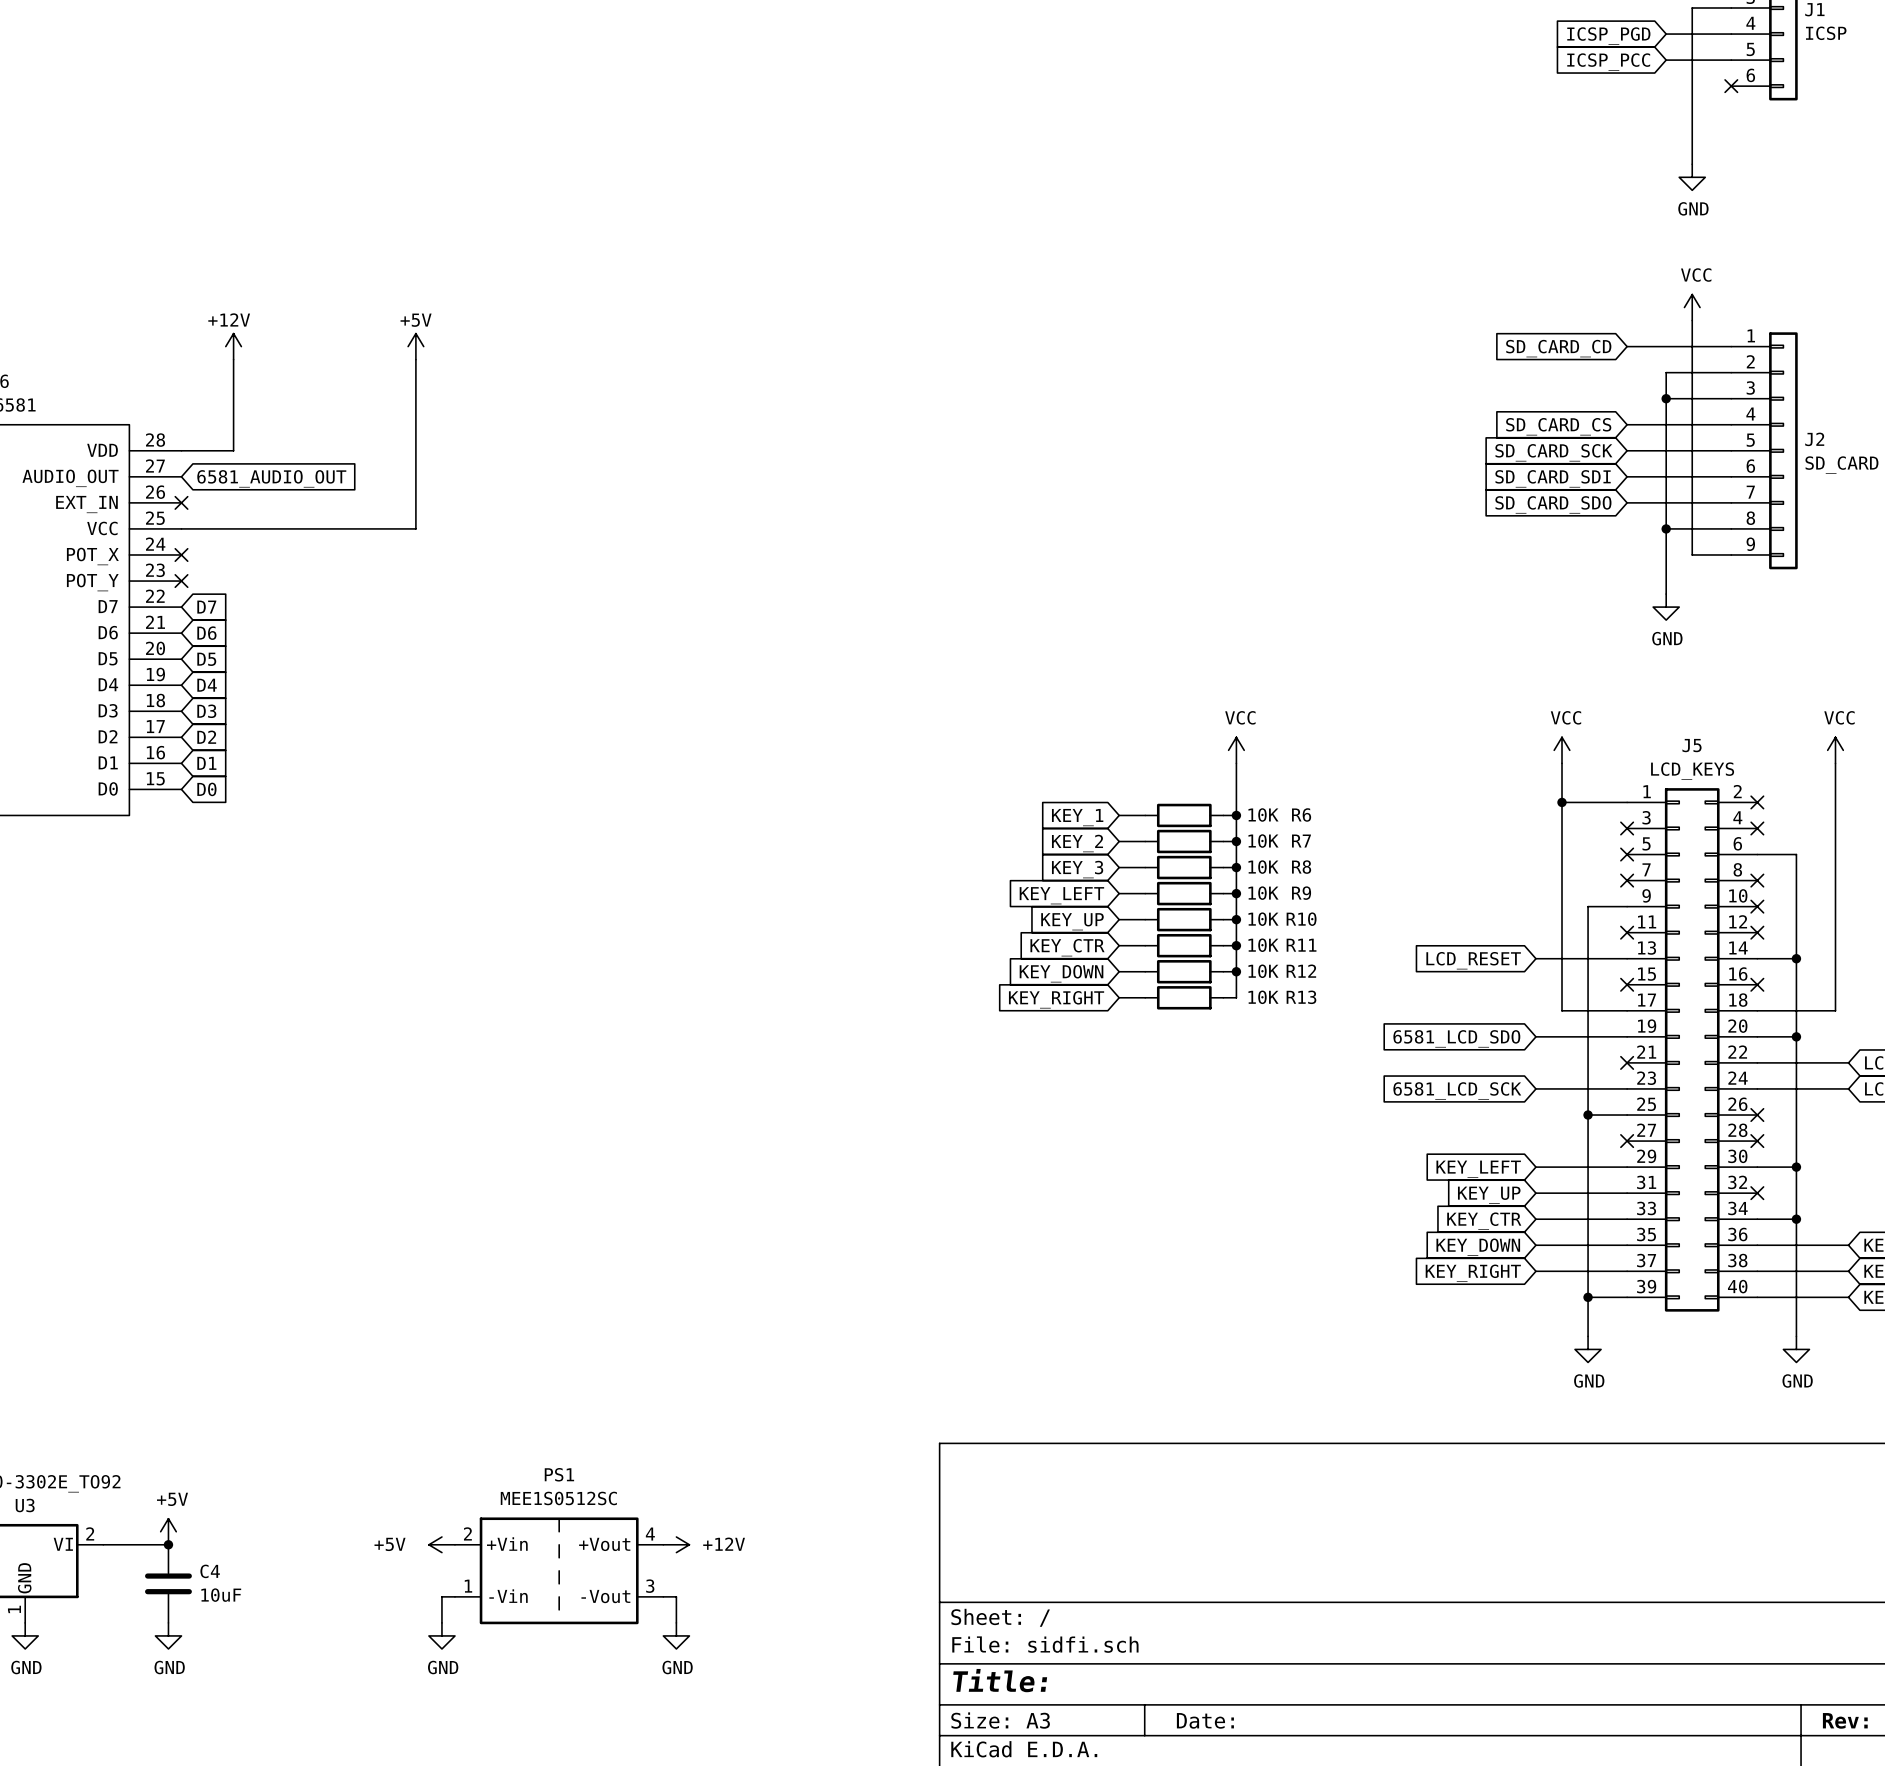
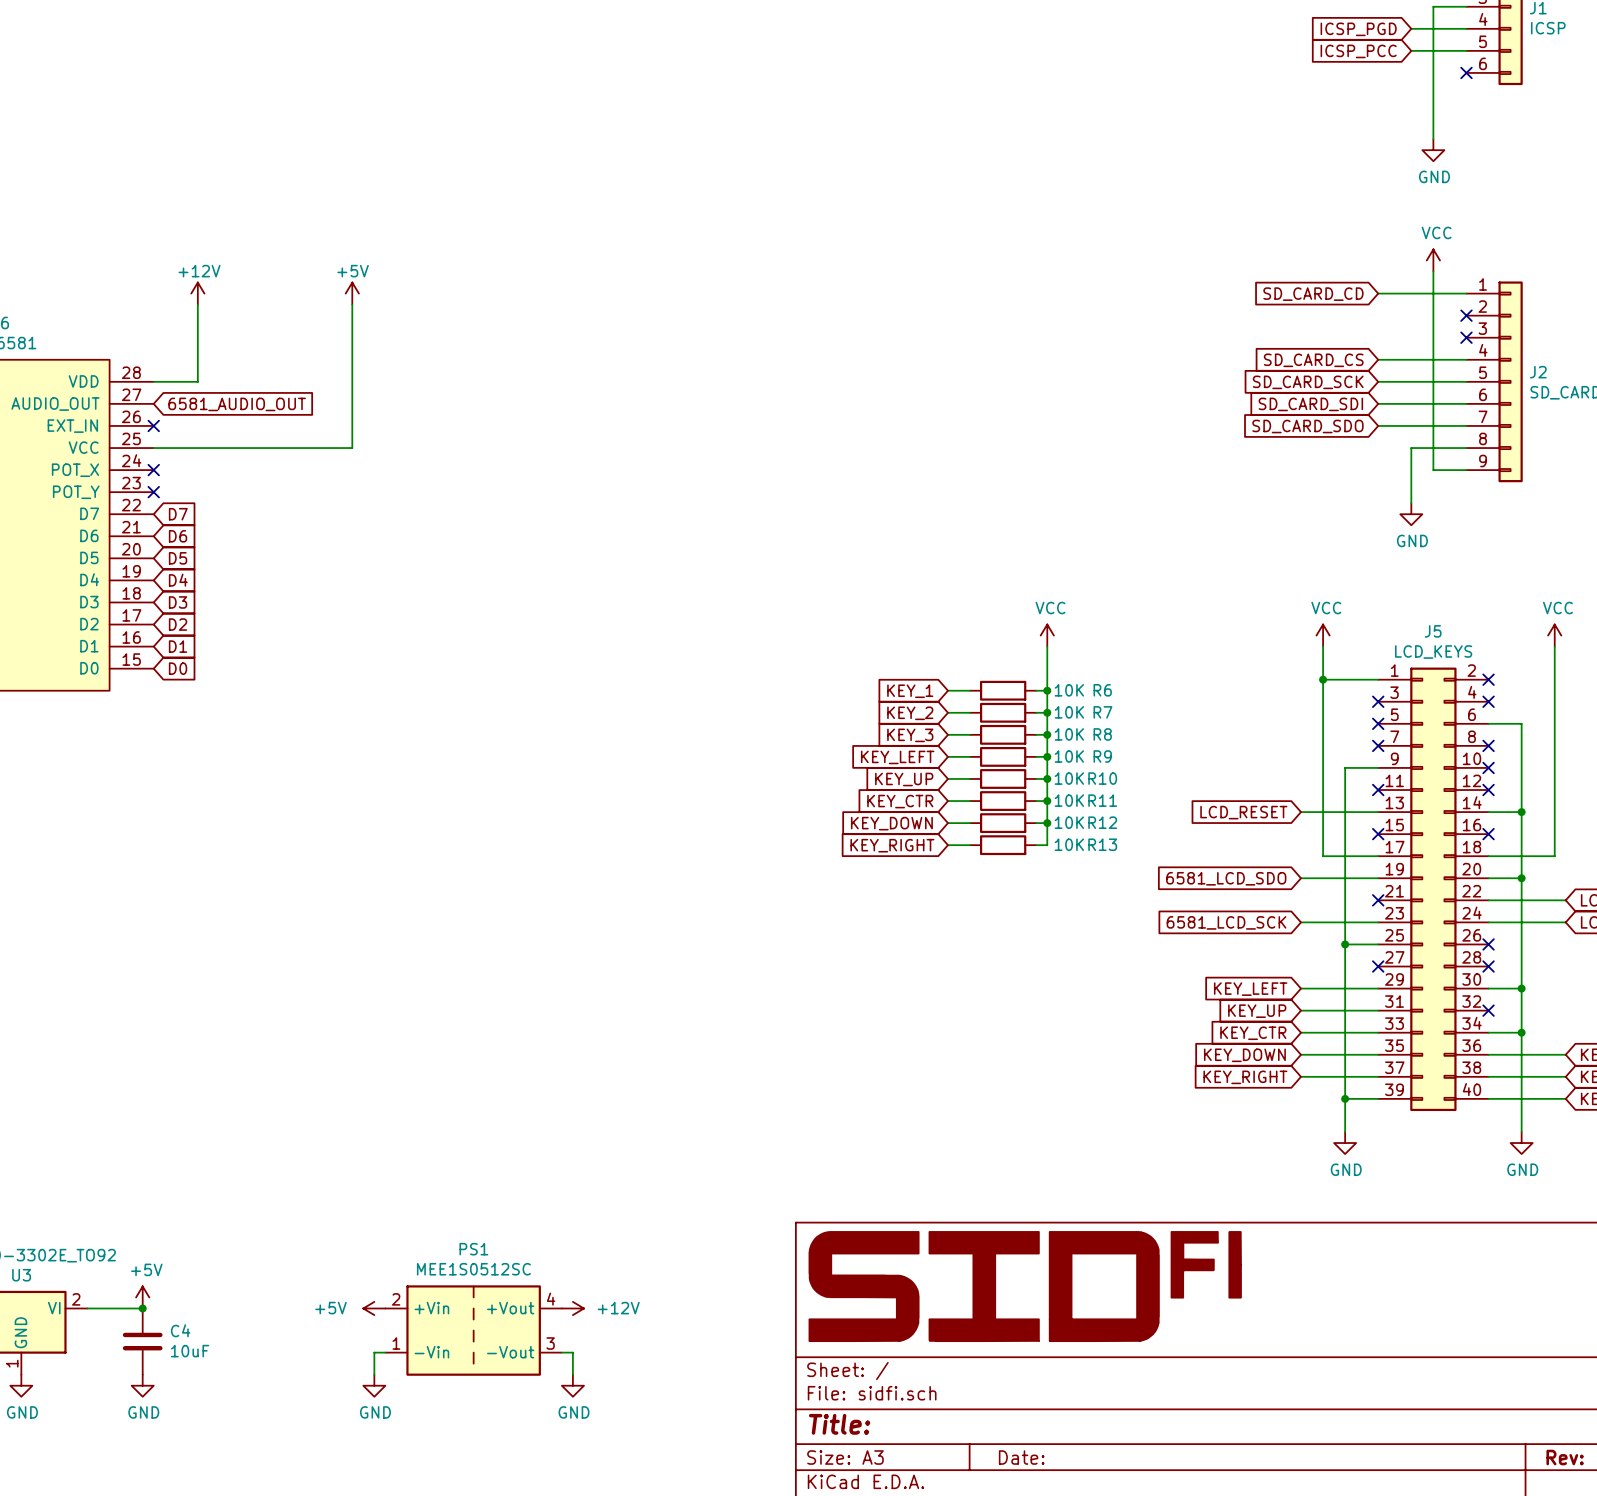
wire: (1731, 372) (1666, 372) (1666, 528) -> none
no-connect mark: none -> (1466, 315)
wire: (1666, 398) (1731, 398) -> none
junction: (1666, 398) -> none
no-connect mark: none -> (1466, 337)
junction: (1666, 528) -> none
power symbol: none -> (1025, 1286)

